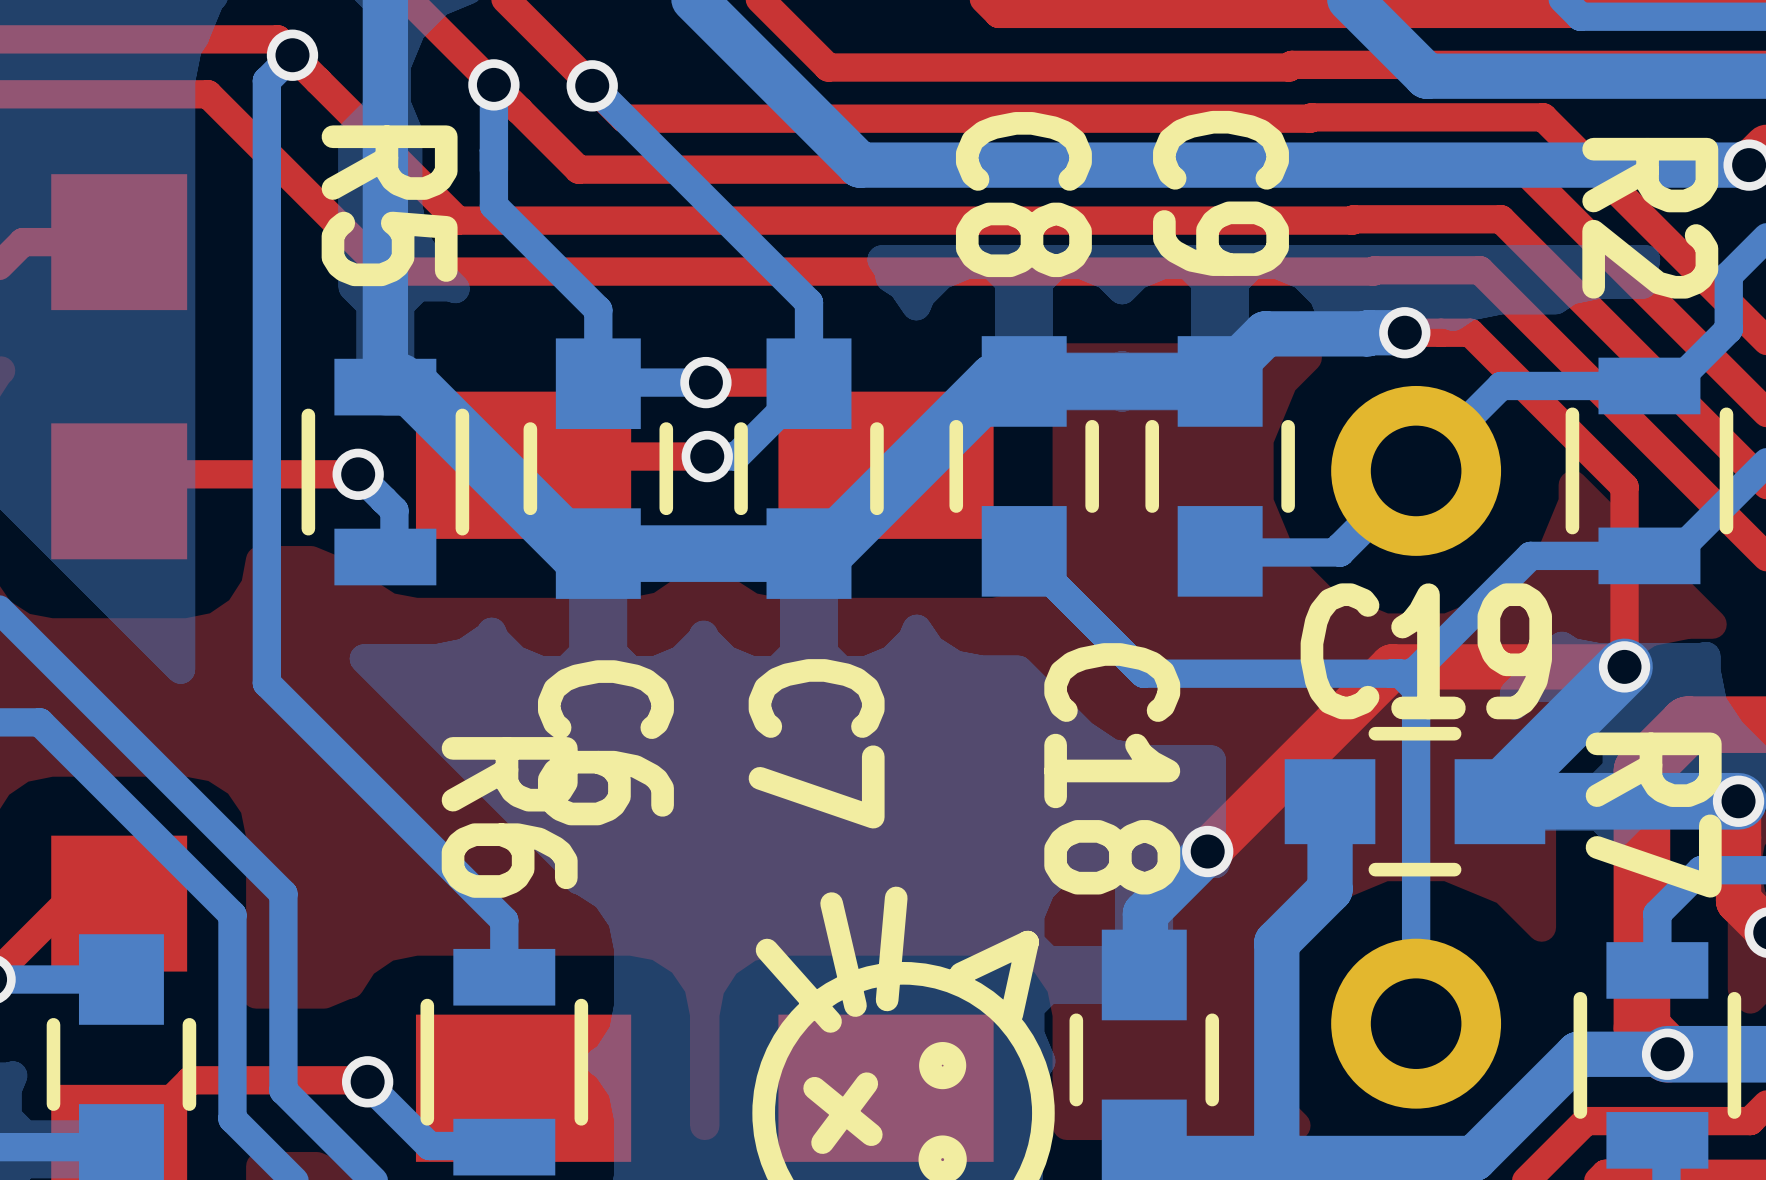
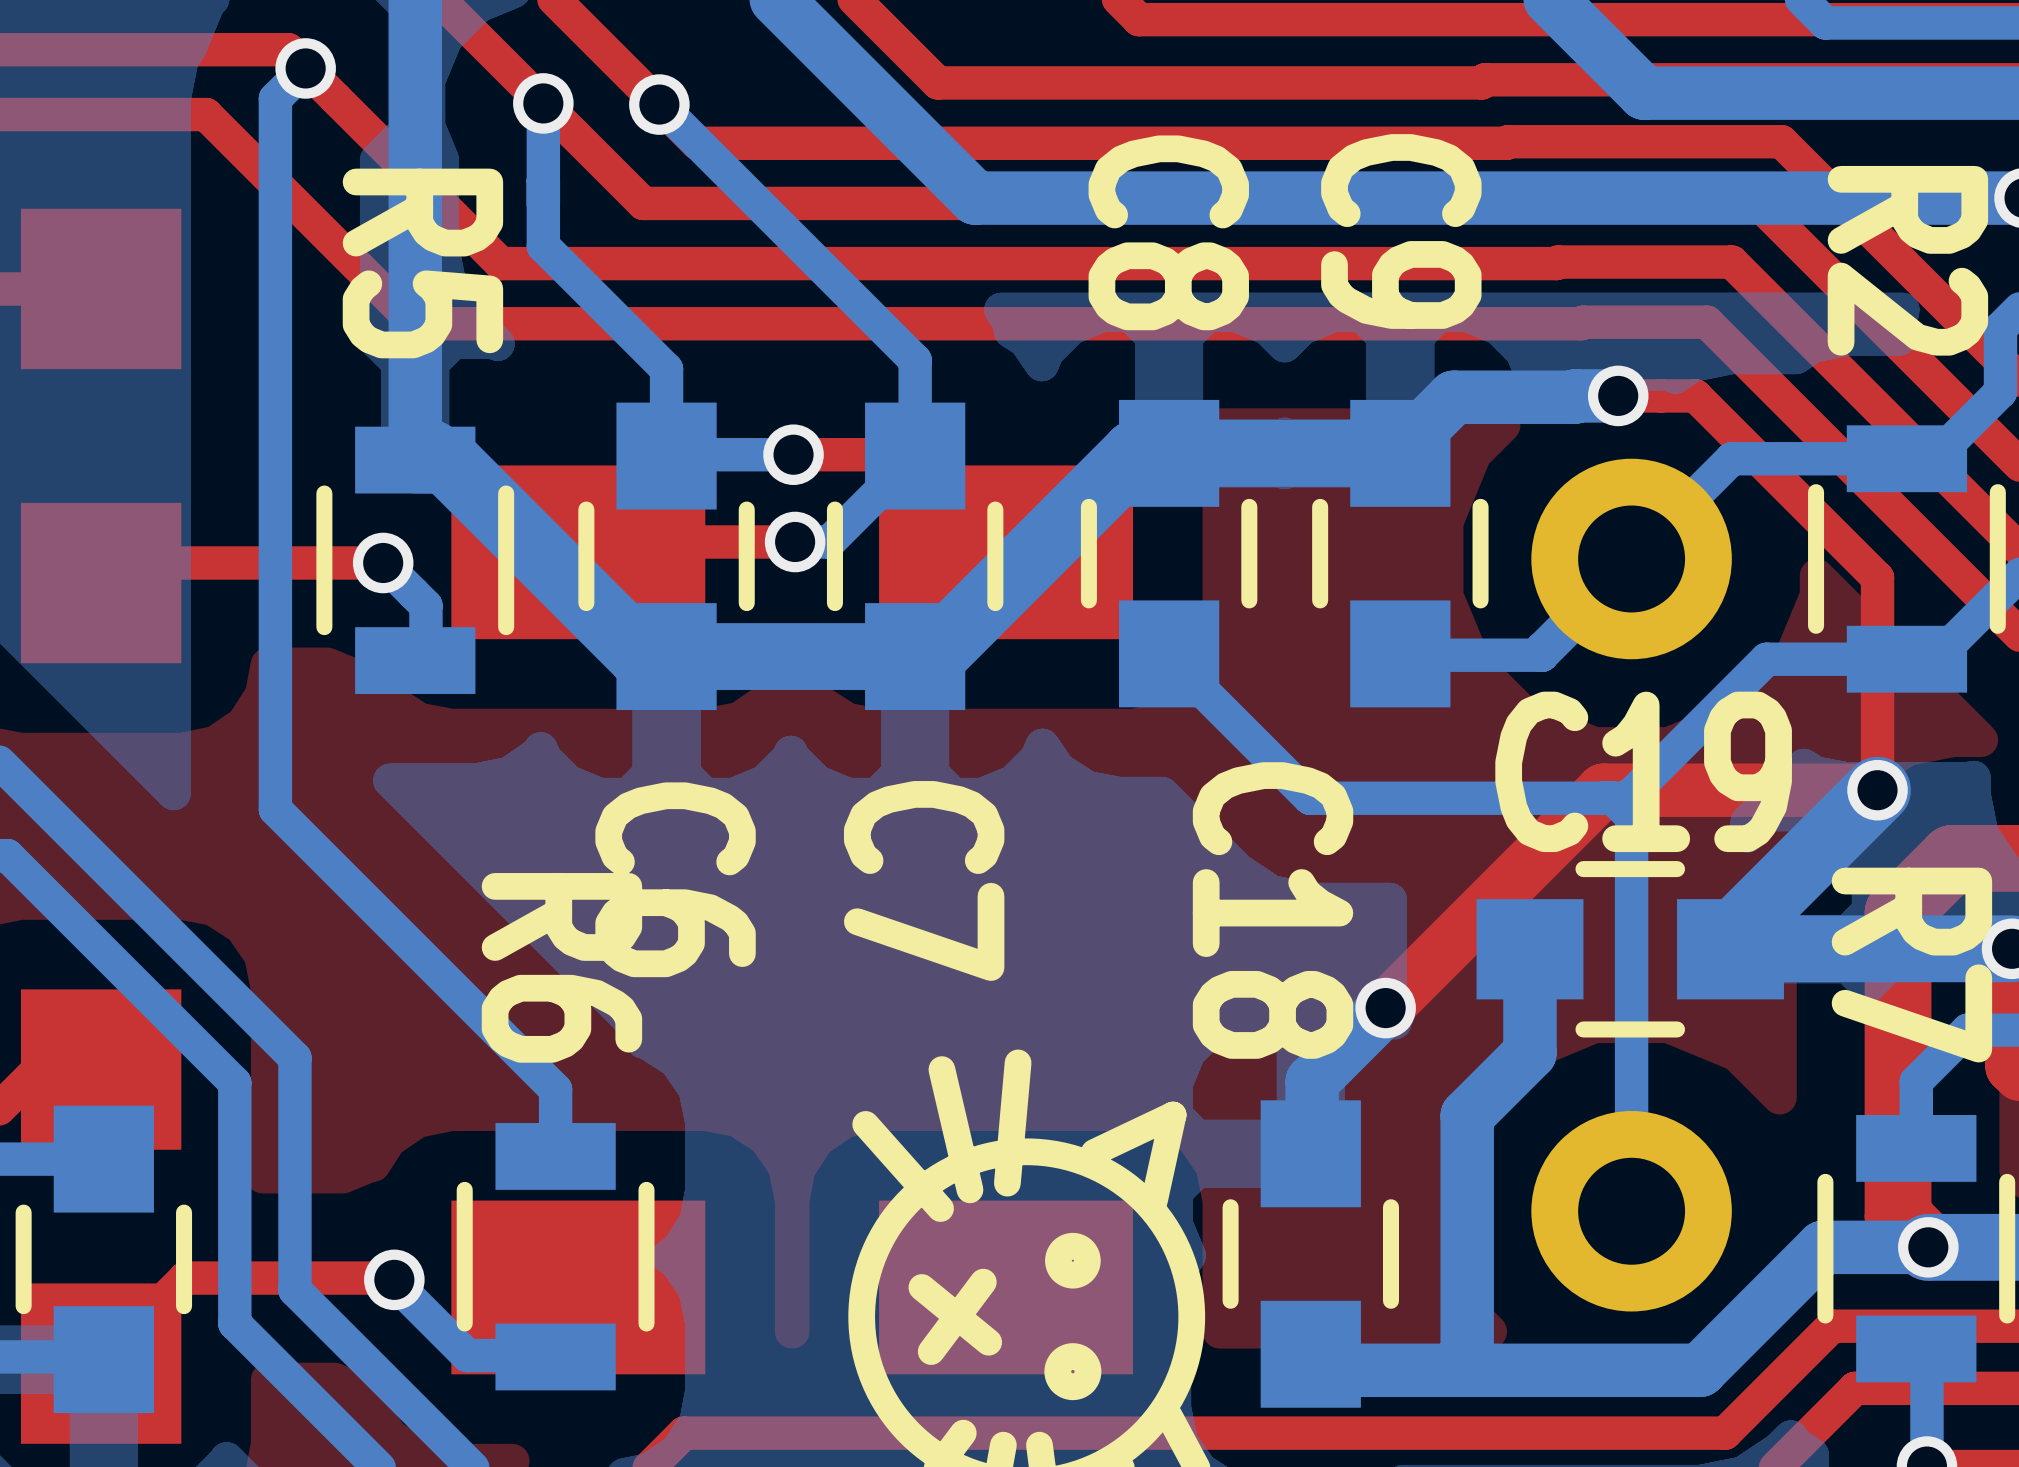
R5 name position: R5 (389, 205) -> R5 (422, 263)

